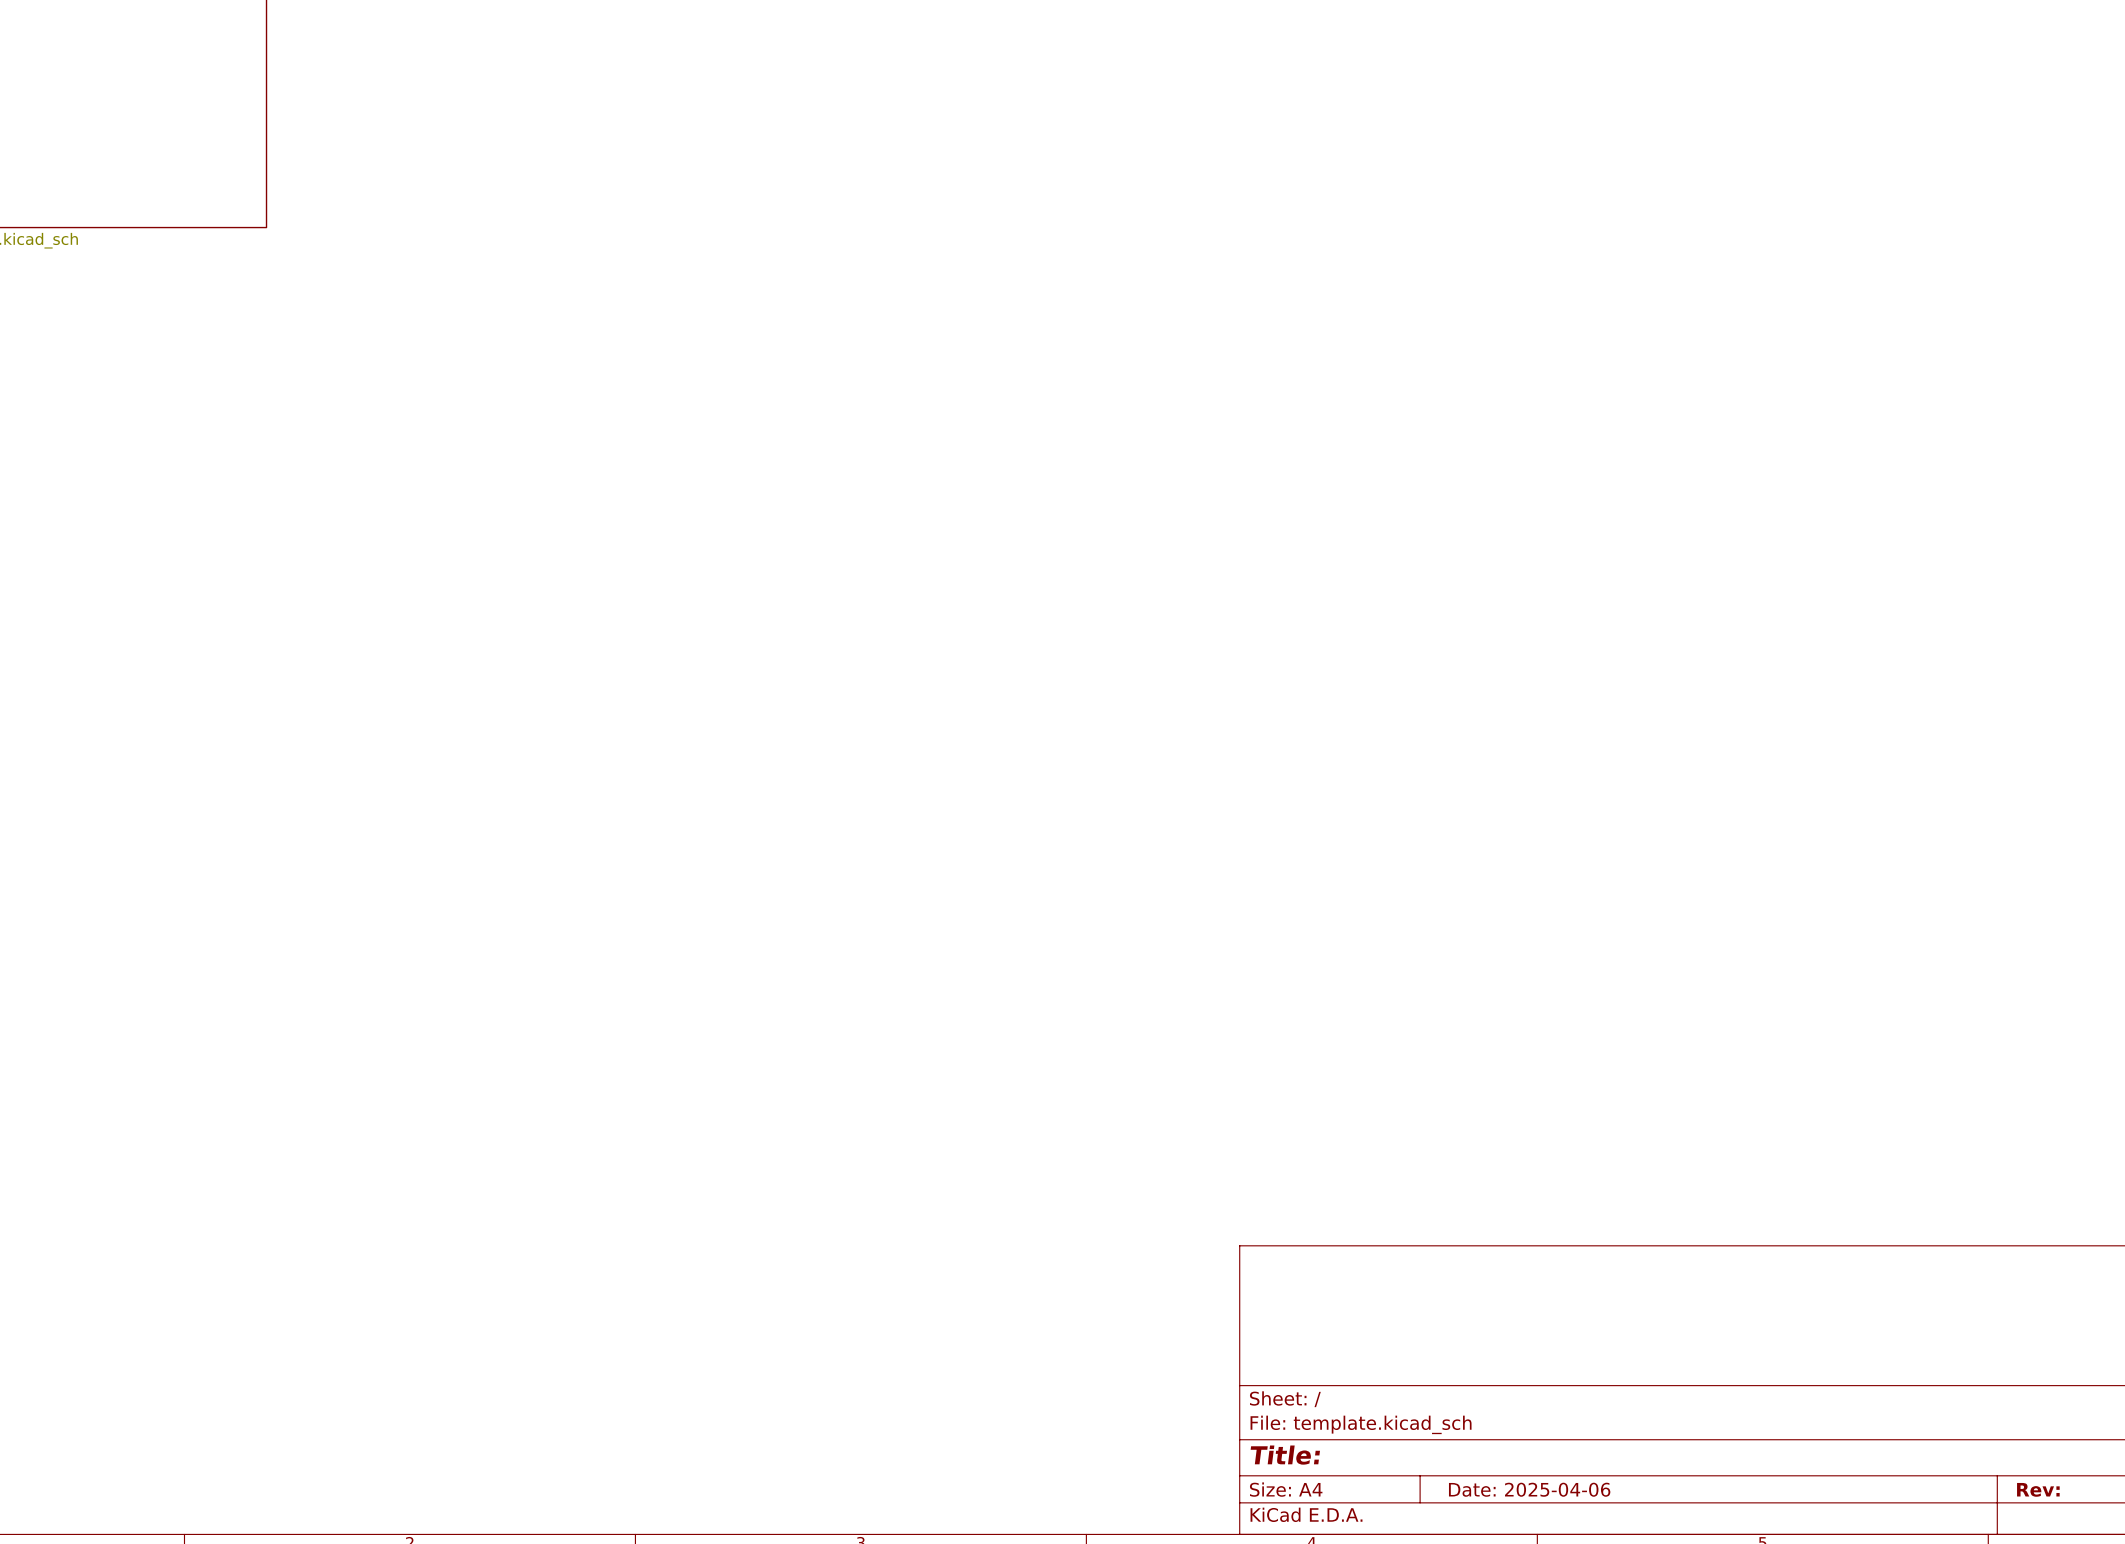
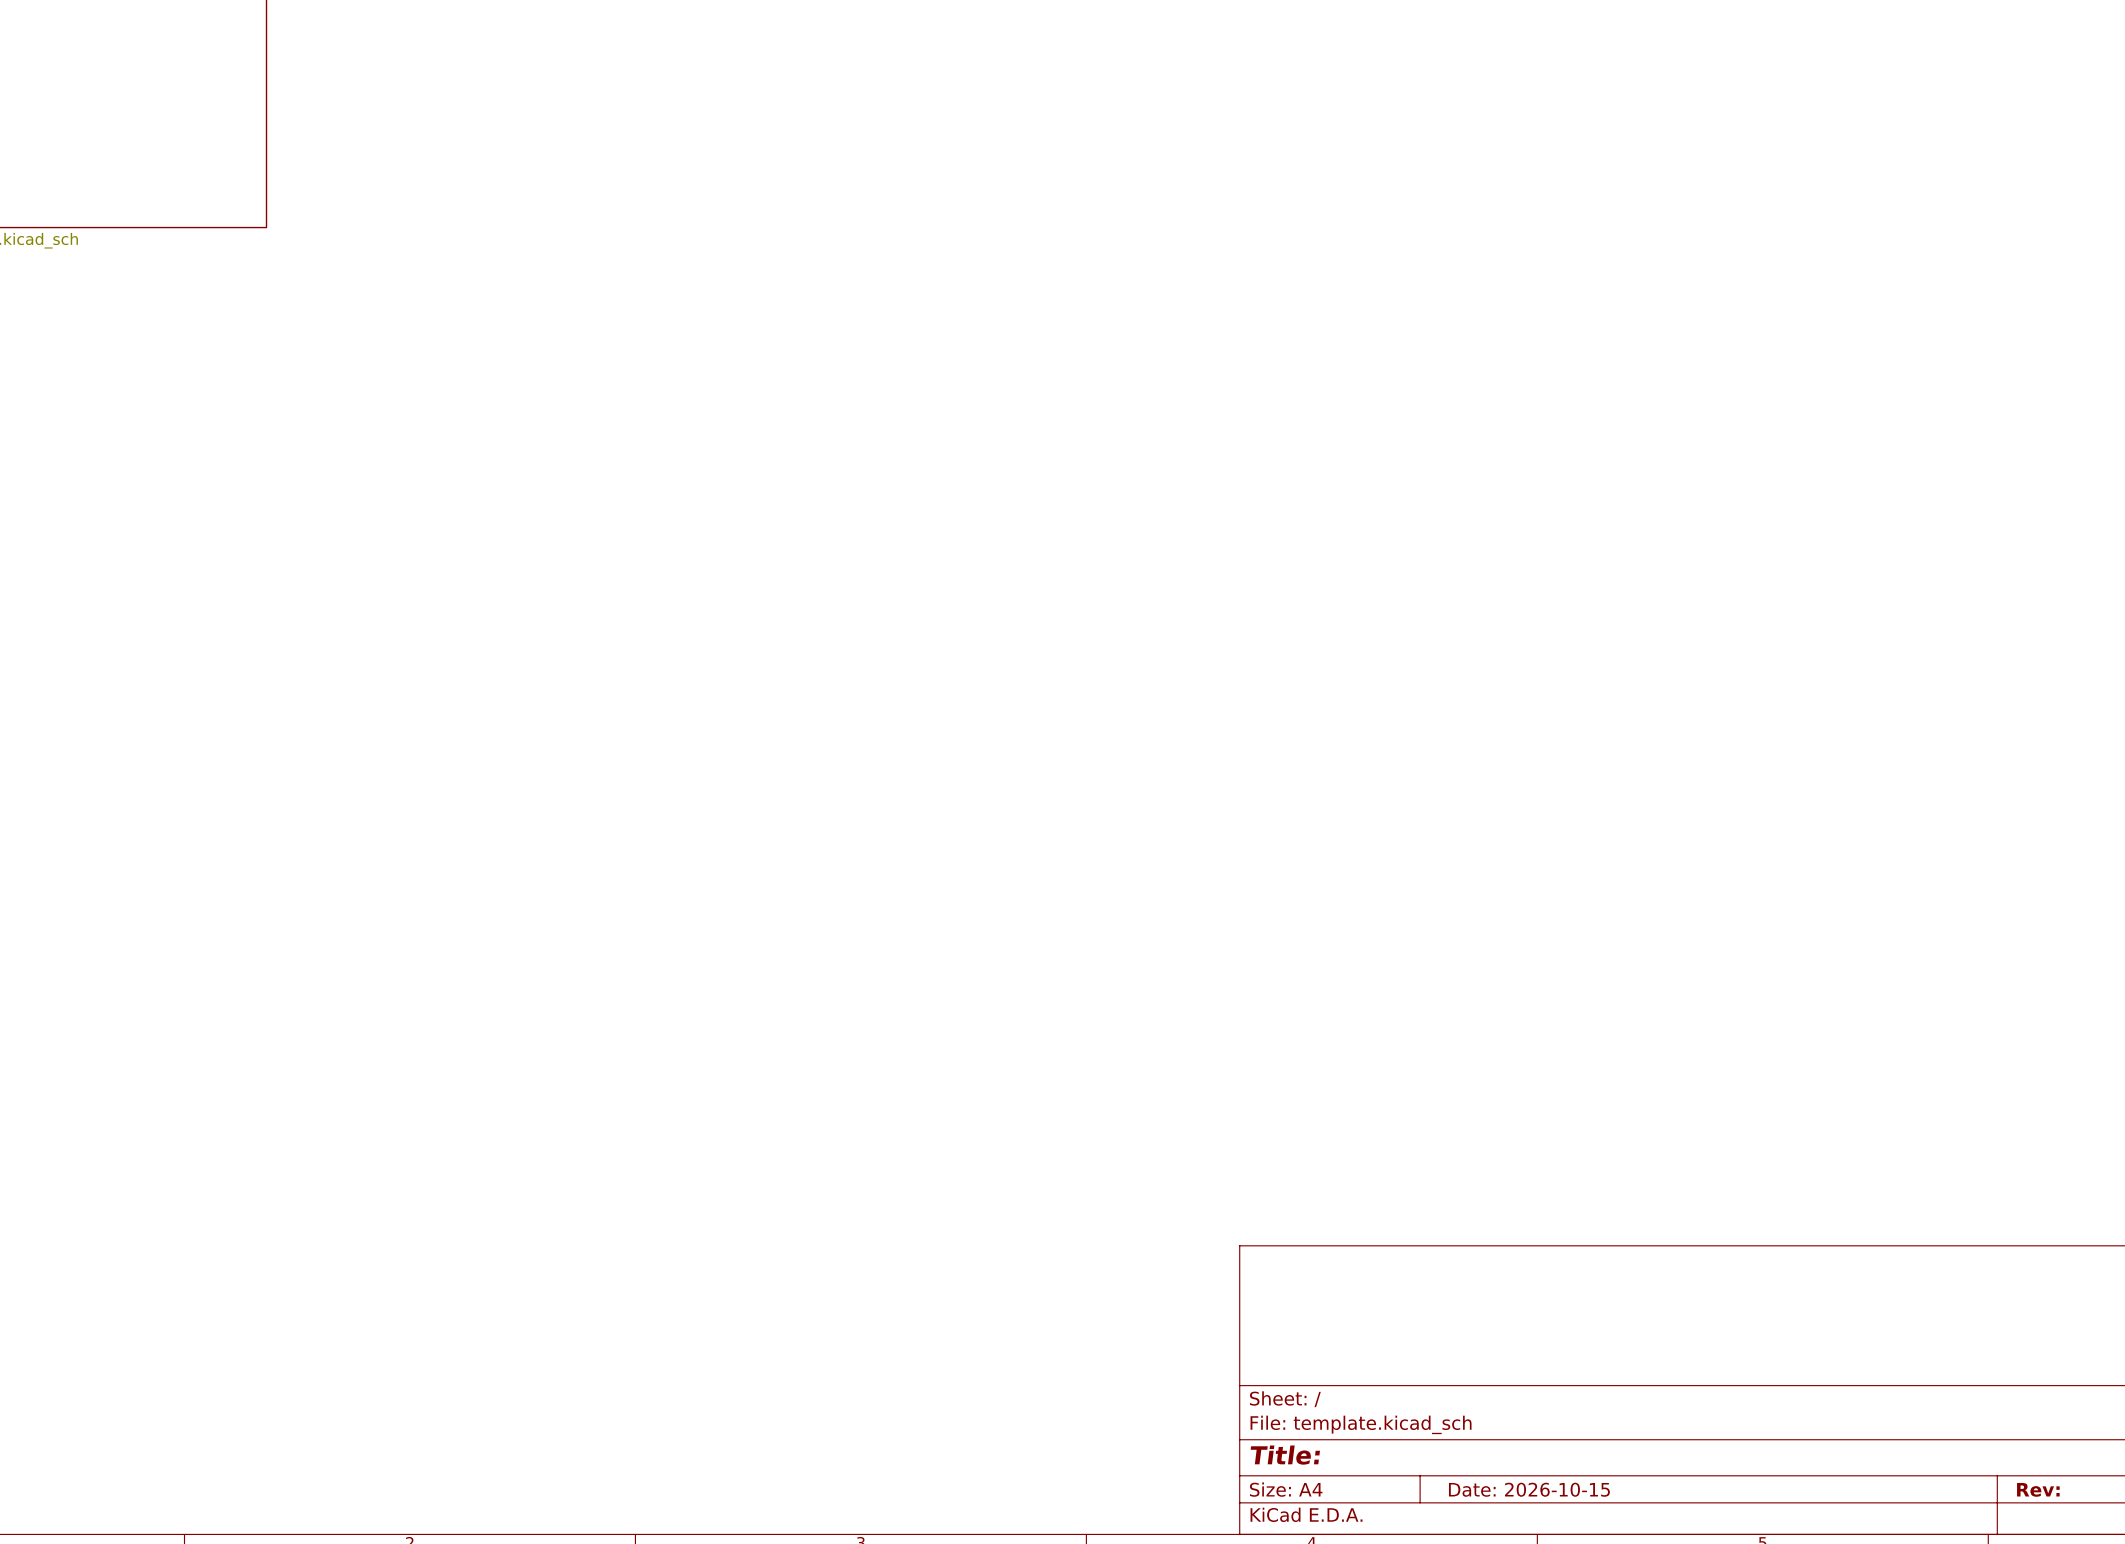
title block: Date: 2025-04-06 (1529, 1489) -> Date: 2026-10-15 (1529, 1489)

